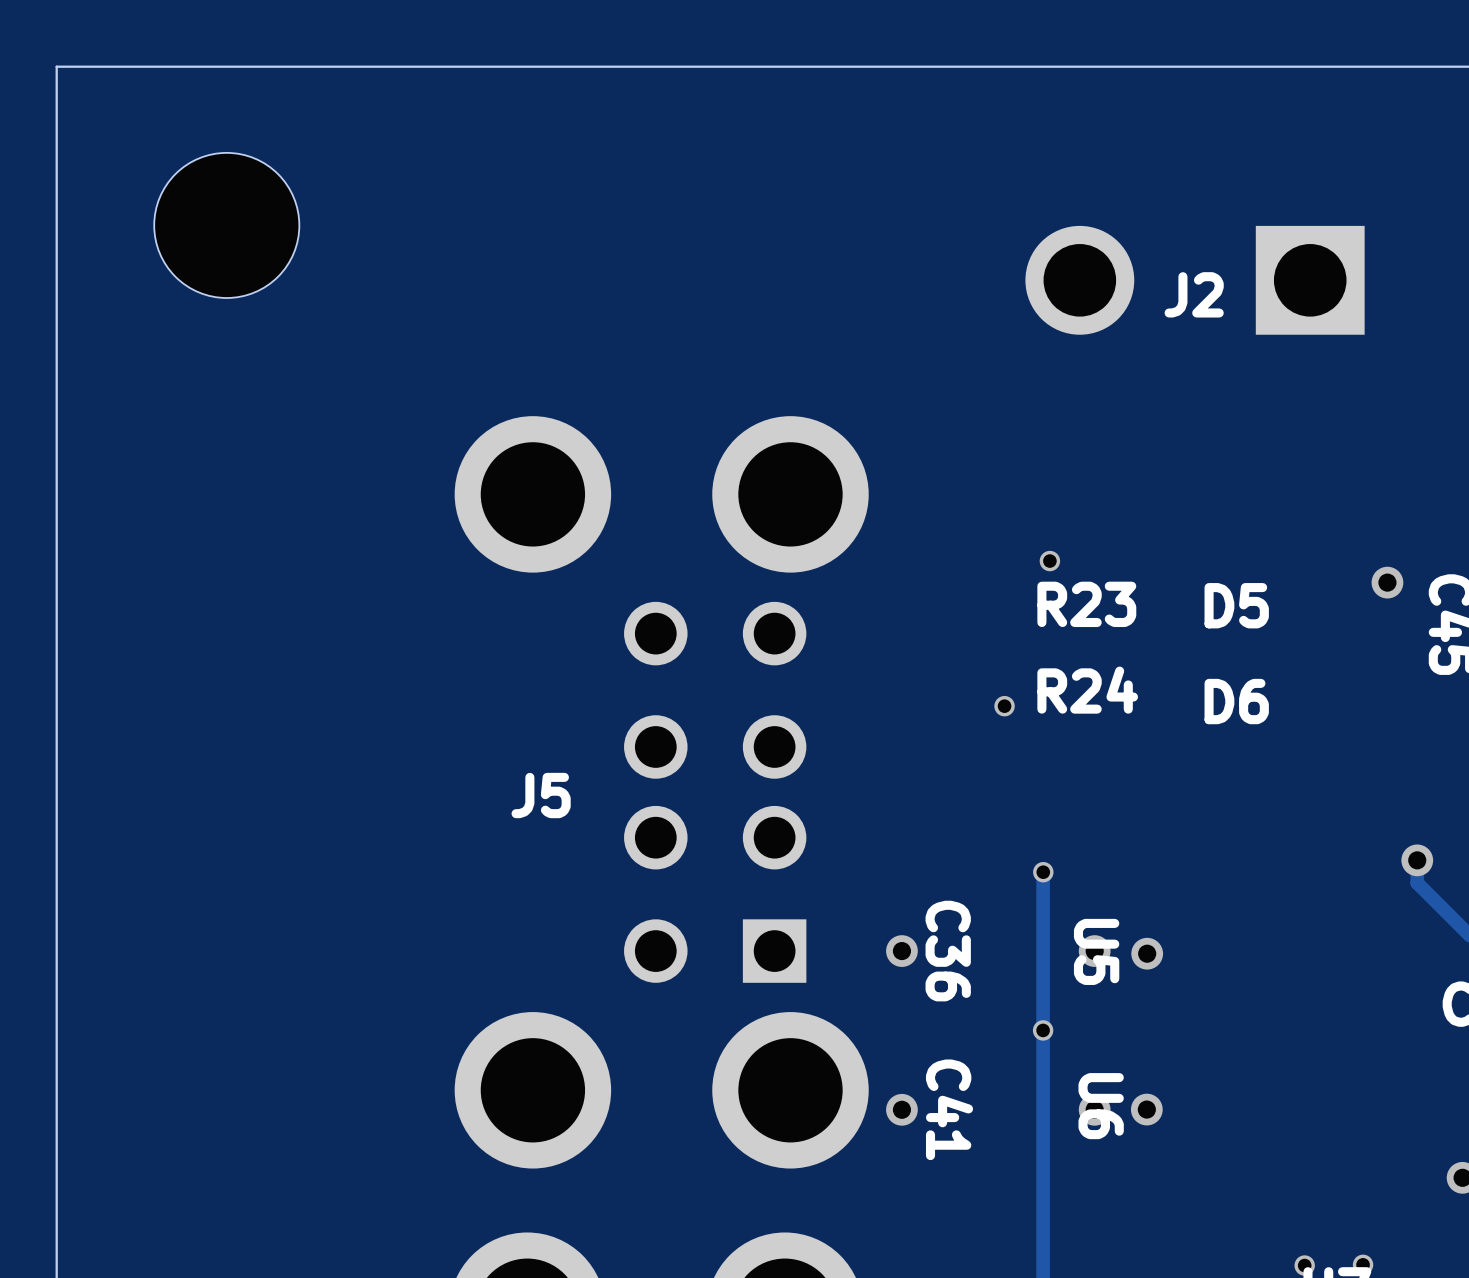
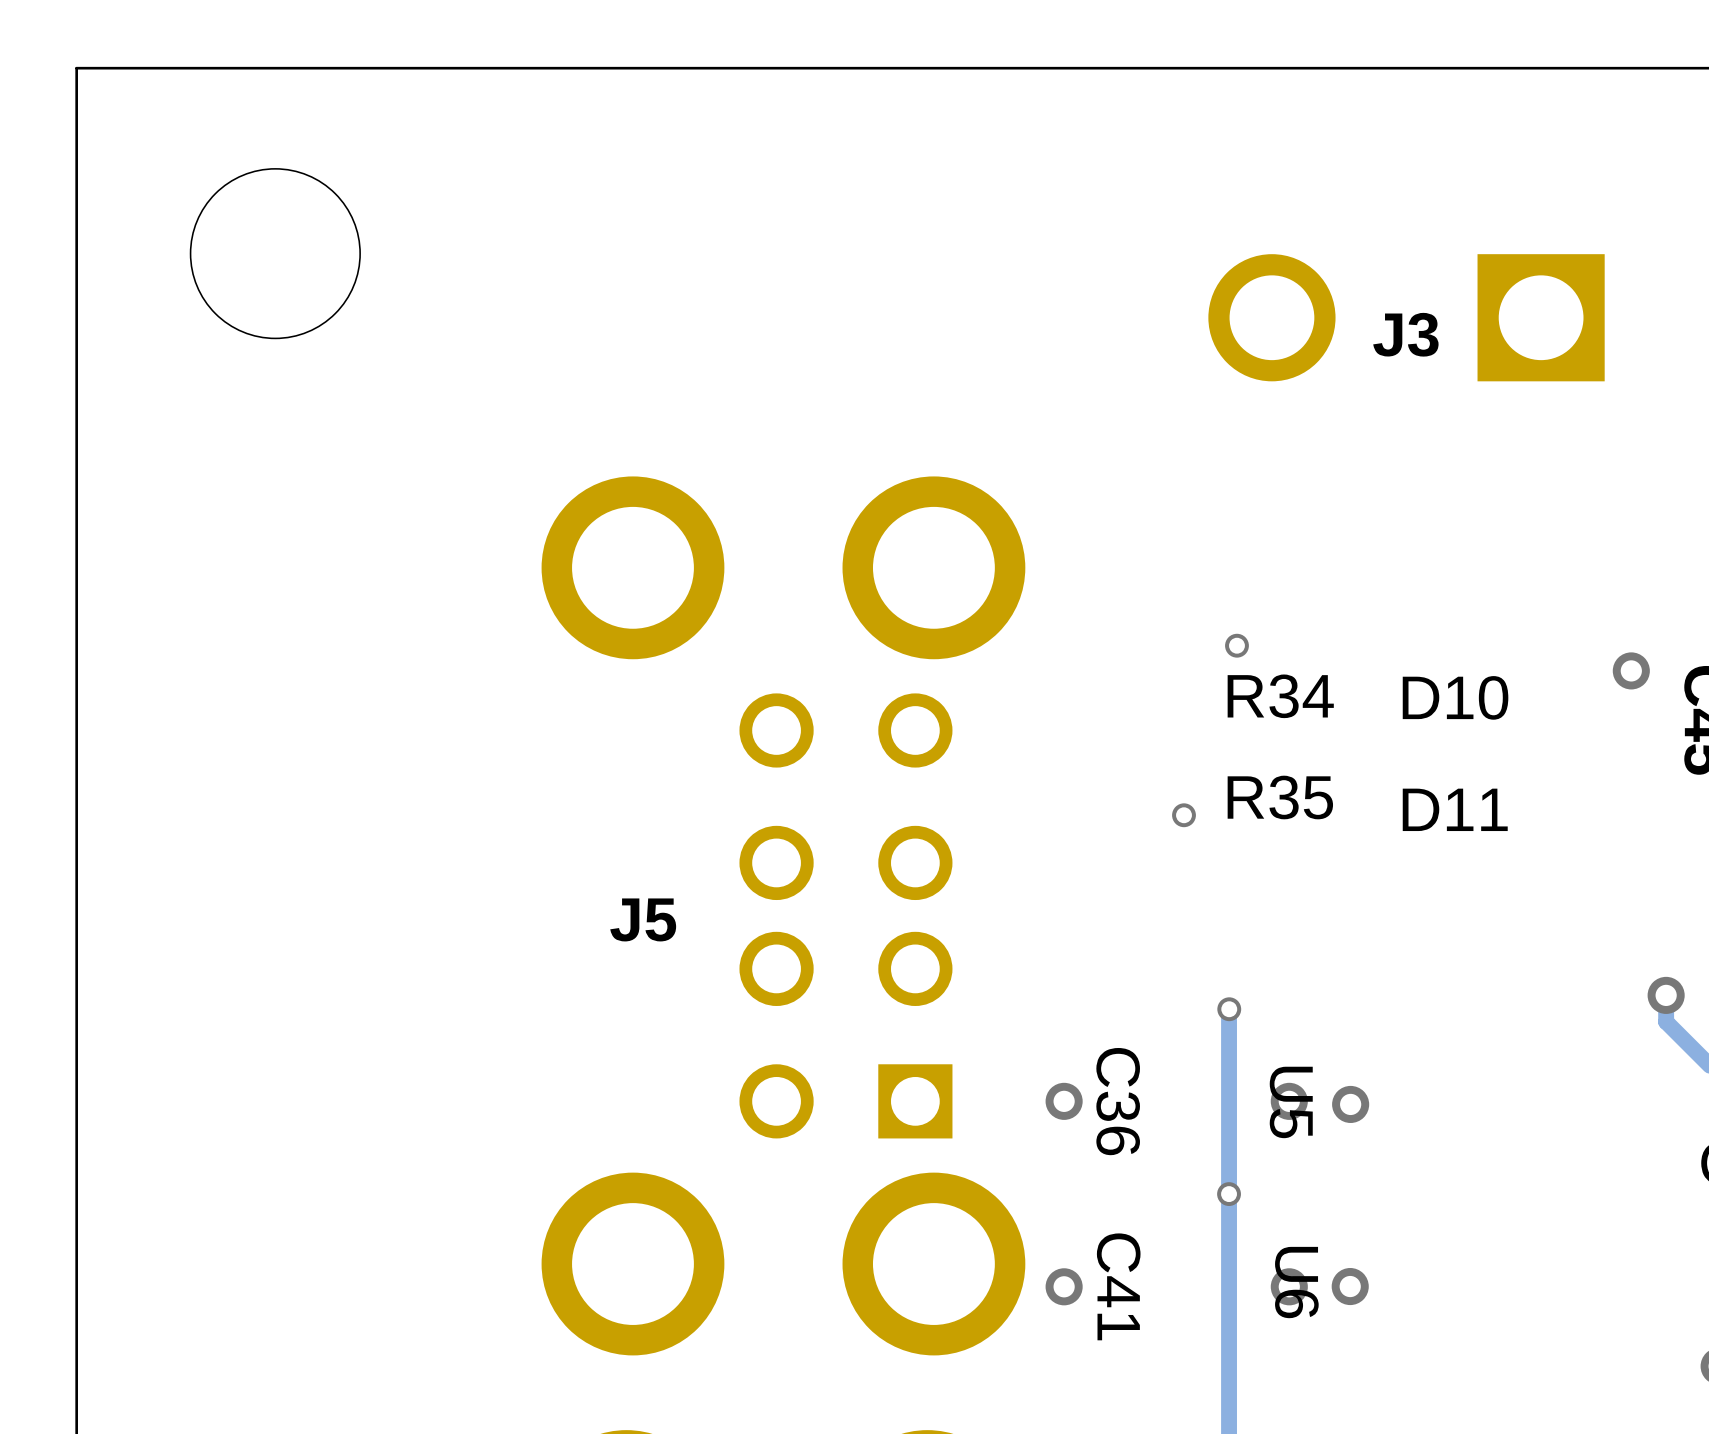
J2 name: J2 (1194, 294) -> J3 (1405, 334)
R23 name: R23 (1086, 604) -> R34 (1280, 696)
D5 name: D5 (1236, 605) -> D10 (1455, 697)
R24 name: R24 (1087, 690) -> R35 (1280, 797)
D6 name: D6 (1236, 701) -> D11 (1455, 809)

